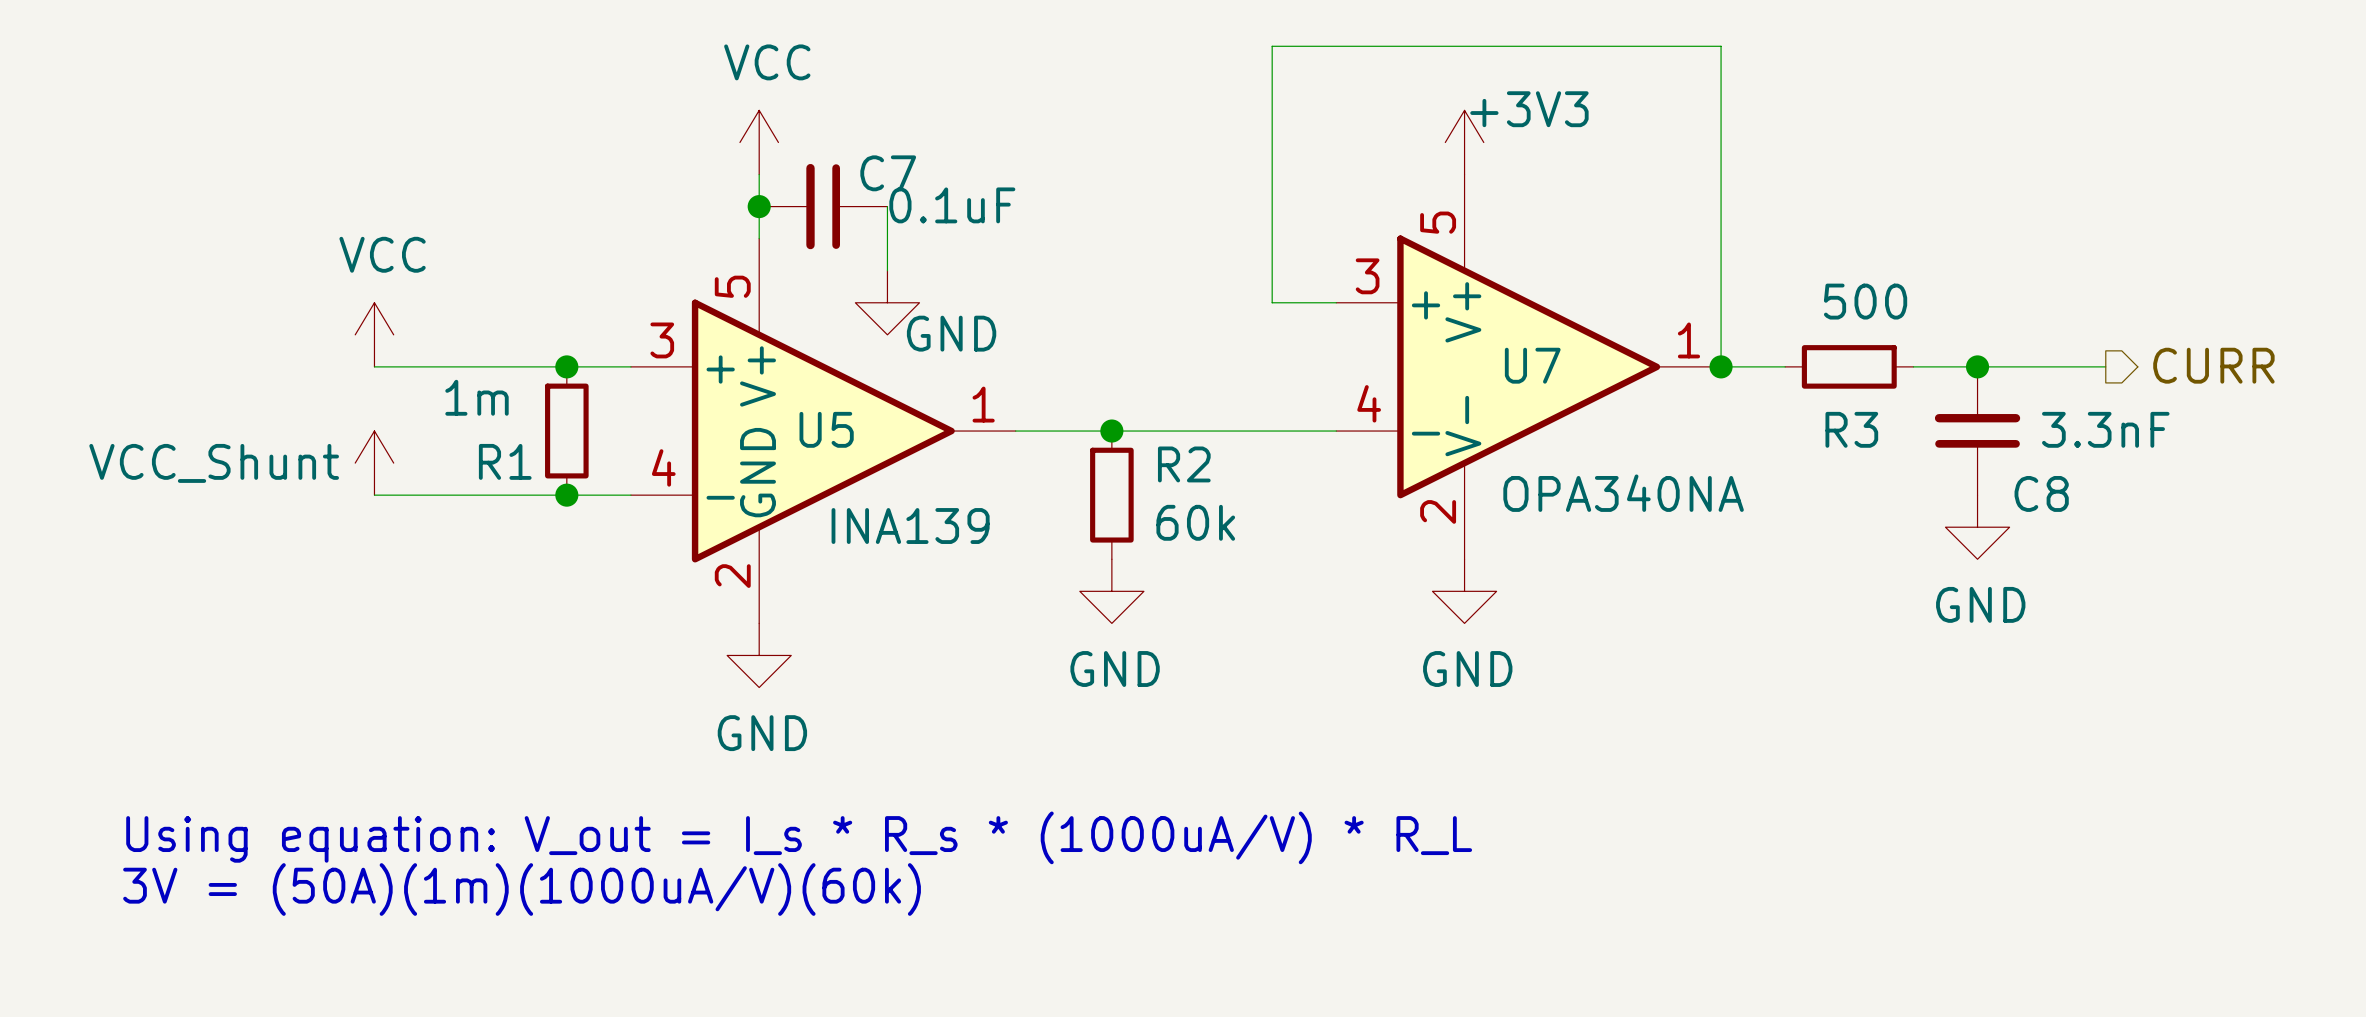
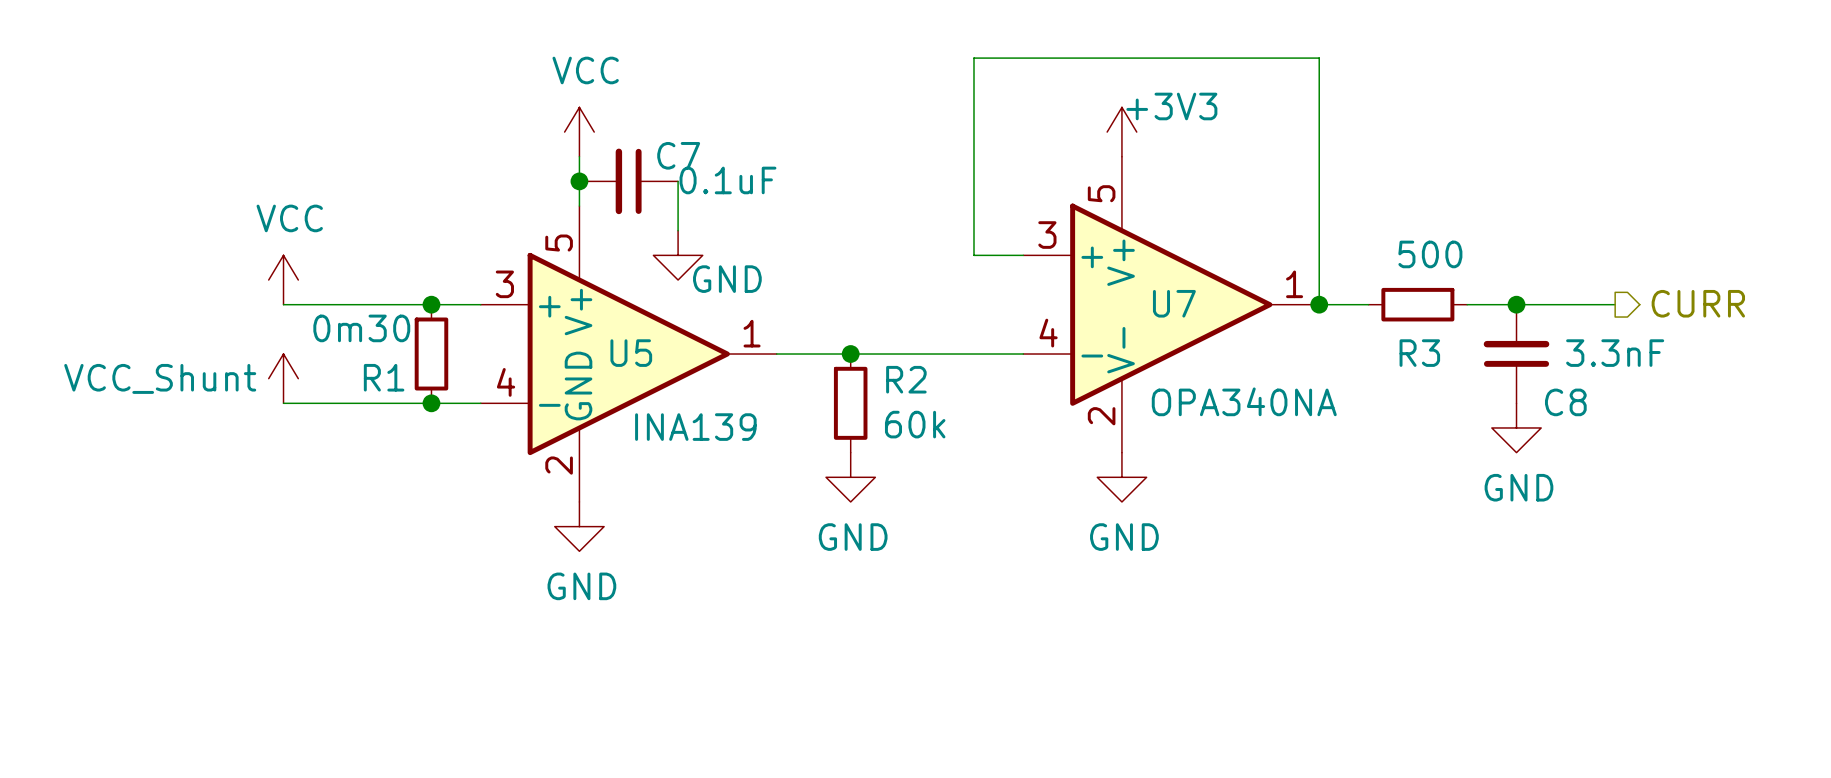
R1 value: 1m (476, 397) -> 0m30 (361, 328)
text: Using equation: V_out = I_s * R_s * (1000uA/V) * R_L (799, 837) -> none
text: 3V = (50A)(1m)(1000uA/V)(60k) (522, 889) -> none

